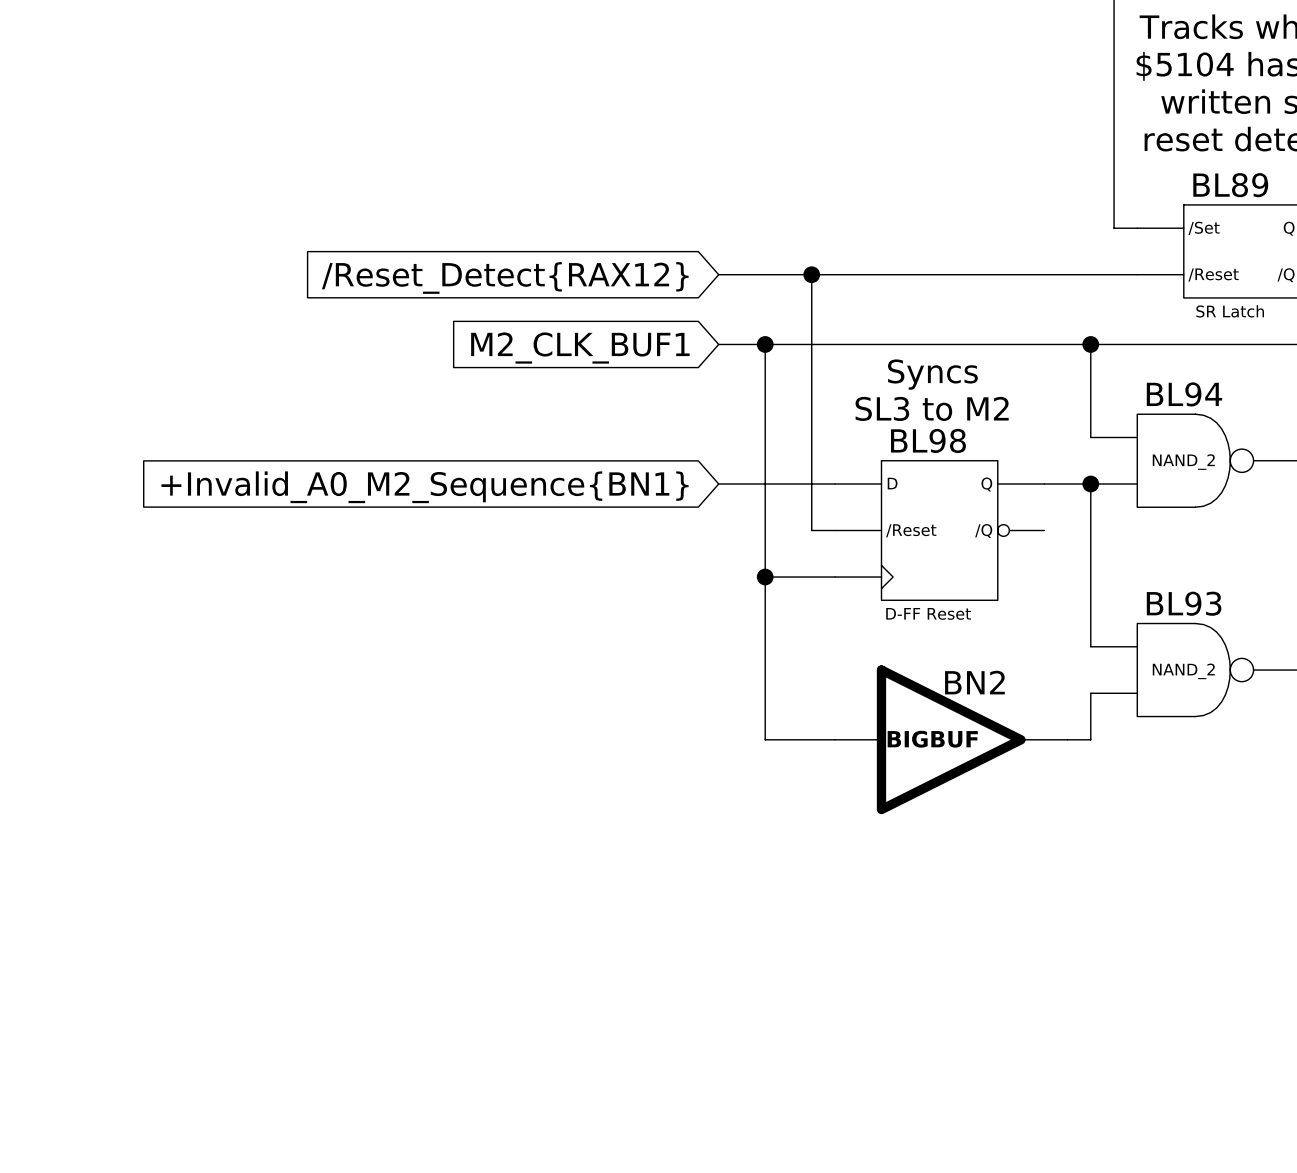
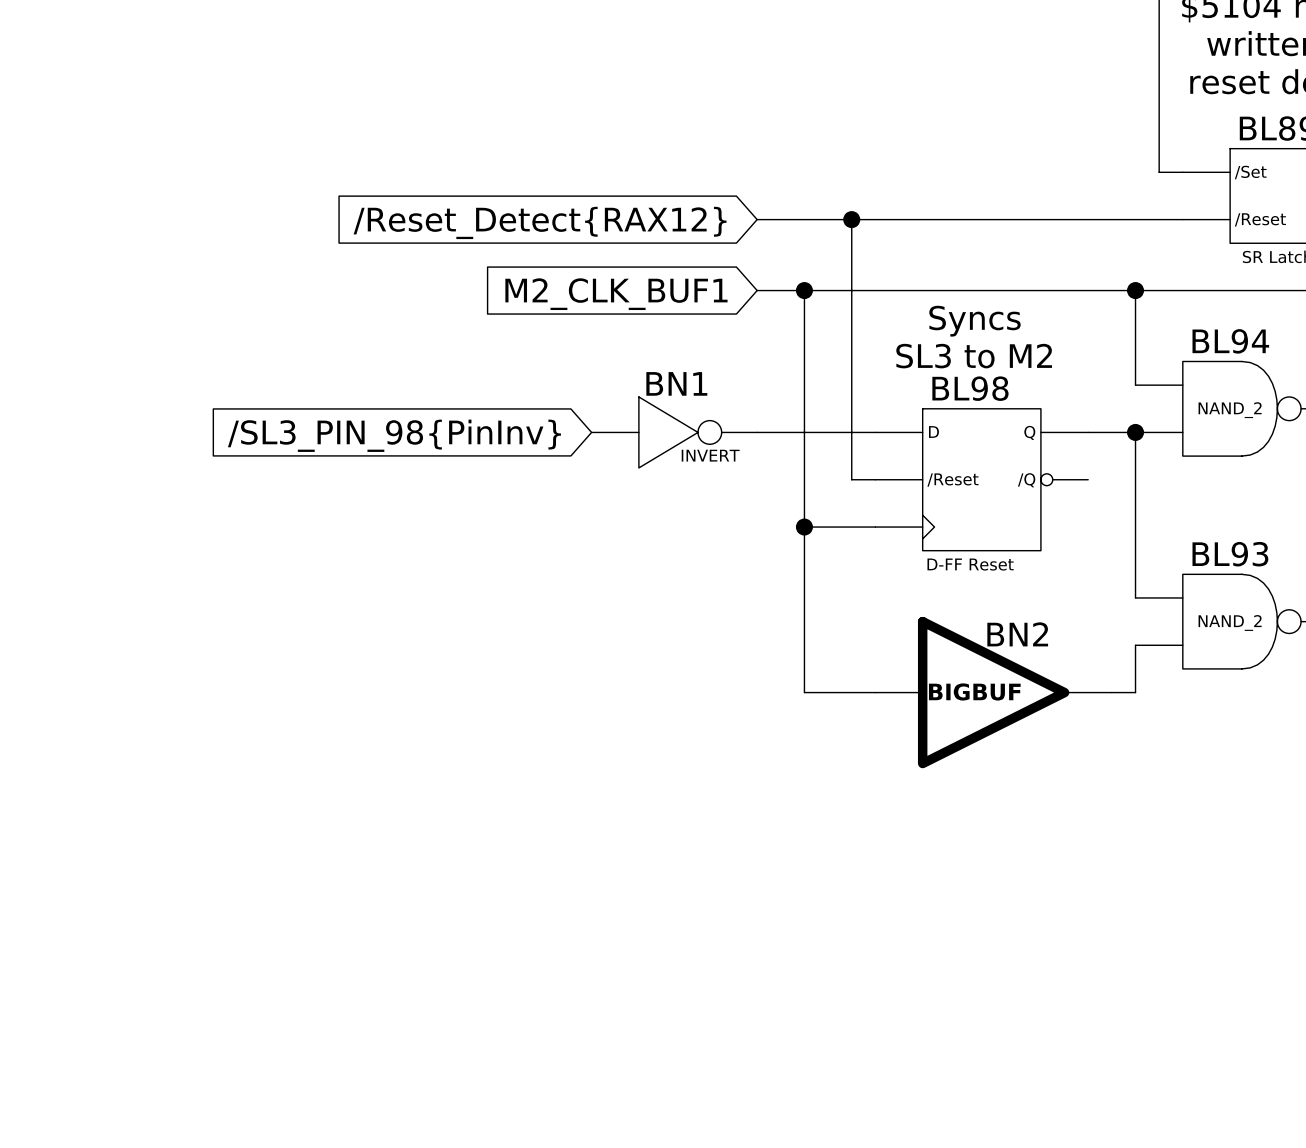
BN1: none -> INVERT (674, 432)
global label: none -> /SL3_PIN_98{PinInv} (394, 435)
global label: +Invalid_A0_M2_Sequence{BN1} (425, 487) -> none

